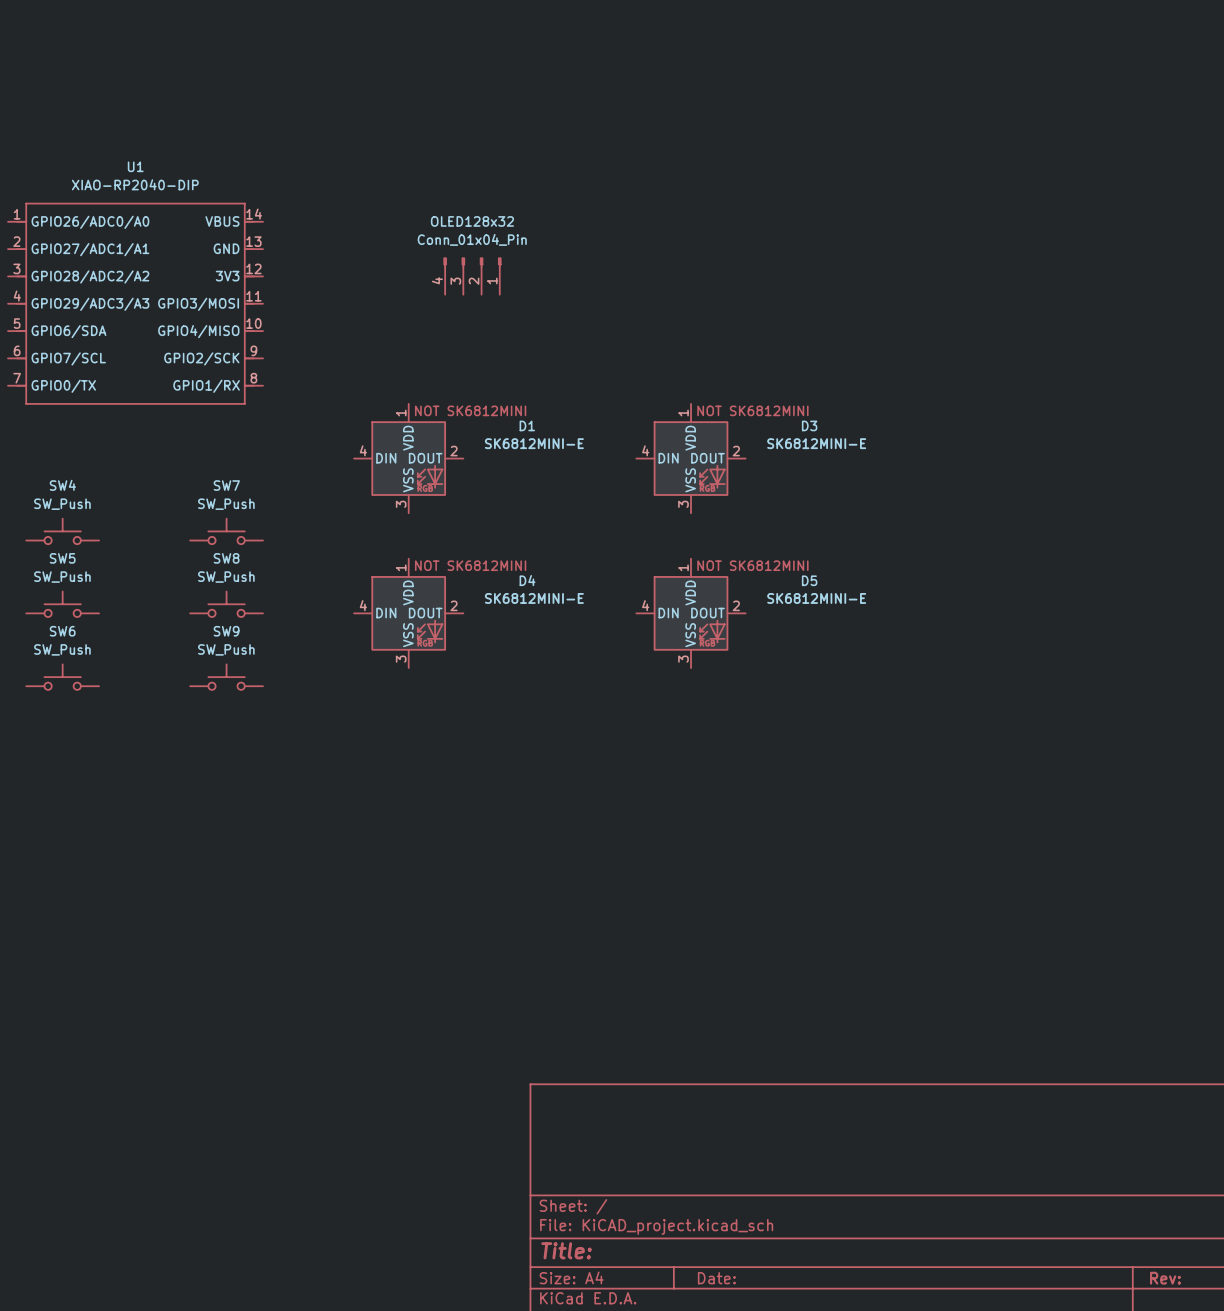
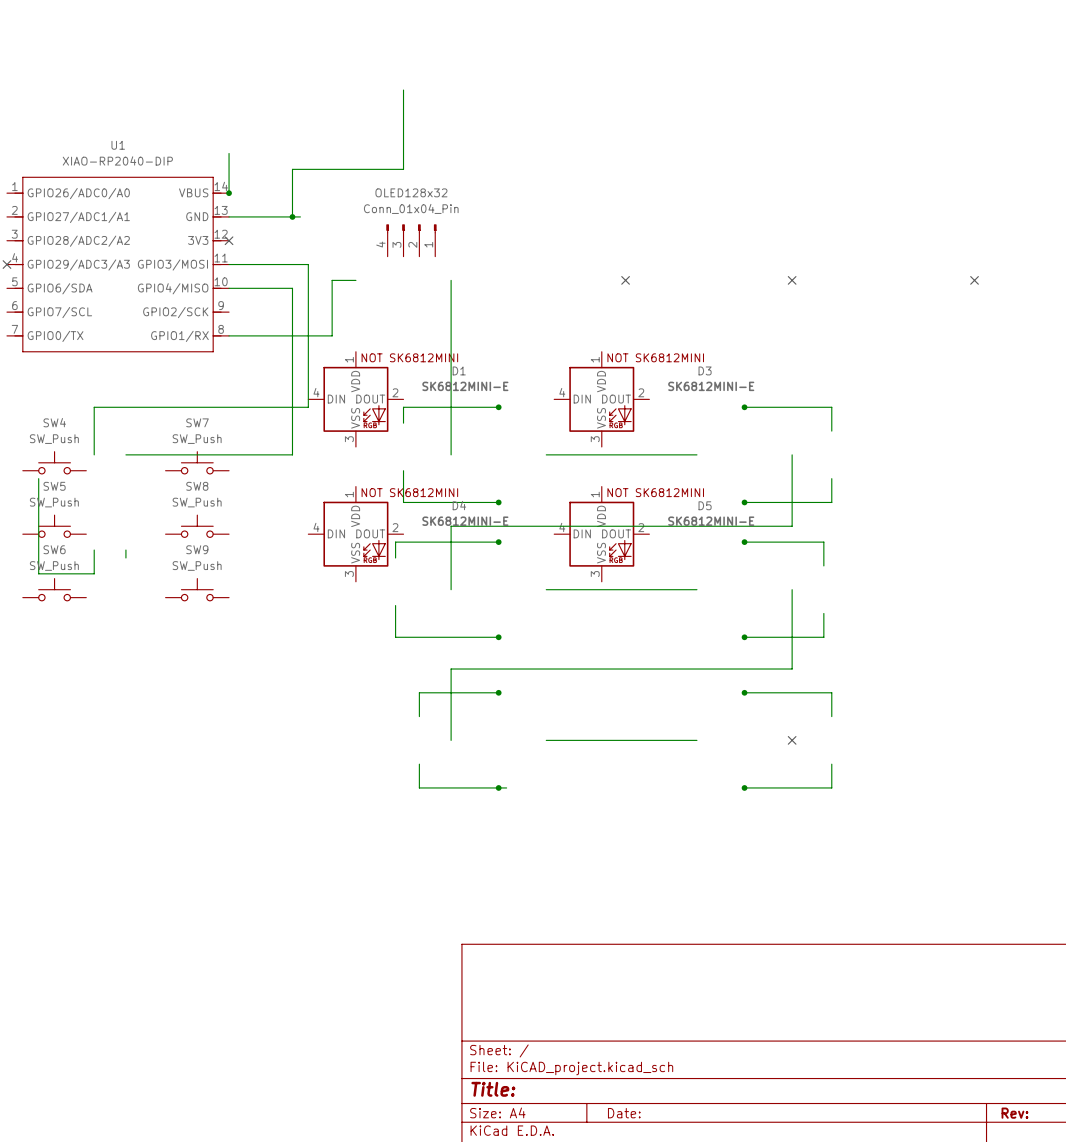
wire: none -> (403, 90) (403, 169) (292, 169) (292, 216)
wire: none -> (229, 153) (229, 193)
junction: none -> (229, 193)
wire: none -> (229, 216) (300, 216)
junction: none -> (292, 216)
no-connect mark: none -> (229, 240)
no-connect mark: none -> (6, 264)
wire: none -> (229, 264) (308, 264) (308, 407) (94, 407) (94, 454)
wire: none -> (355, 280) (332, 280) (332, 335) (229, 335)
wire: none -> (451, 280) (451, 454)
no-connect mark: none -> (625, 280)
no-connect mark: none -> (792, 280)
no-connect mark: none -> (974, 280)
wire: none -> (229, 288) (292, 288) (292, 454) (125, 454)
wire: none -> (498, 407) (403, 407) (403, 423)
junction: none -> (498, 407)
wire: none -> (744, 407) (831, 407) (831, 431)
junction: none -> (744, 407)
wire: none -> (546, 454) (696, 454)
wire: none -> (792, 454) (792, 526) (451, 526) (451, 589)
wire: none -> (403, 470) (403, 502) (498, 502)
wire: none -> (38, 478) (38, 573) (94, 573) (94, 550)
wire: none -> (831, 478) (831, 502) (744, 502)
junction: none -> (498, 502)
junction: none -> (744, 502)
wire: none -> (498, 542) (395, 542) (395, 557)
junction: none -> (498, 542)
wire: none -> (744, 542) (823, 542) (823, 565)
junction: none -> (744, 542)
wire: none -> (125, 550) (125, 557)
wire: none -> (546, 589) (696, 589)
wire: none -> (792, 589) (792, 669) (451, 669) (451, 740)
wire: none -> (395, 605) (395, 637) (498, 637)
wire: none -> (823, 613) (823, 637) (744, 637)
junction: none -> (498, 637)
junction: none -> (744, 637)
wire: none -> (498, 692) (419, 692) (419, 716)
junction: none -> (498, 692)
wire: none -> (744, 692) (831, 692) (831, 716)
junction: none -> (744, 692)
wire: none -> (546, 740) (696, 740)
no-connect mark: none -> (792, 740)
wire: none -> (419, 764) (419, 787) (506, 787)
wire: none -> (831, 764) (831, 787) (744, 787)
junction: none -> (498, 787)
junction: none -> (744, 787)

